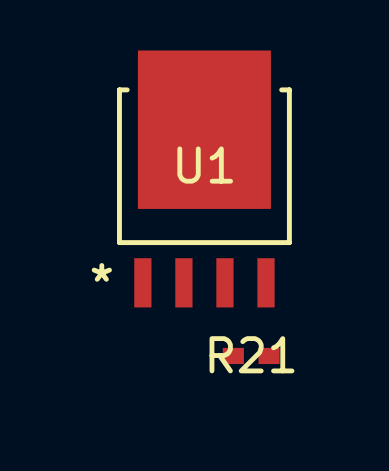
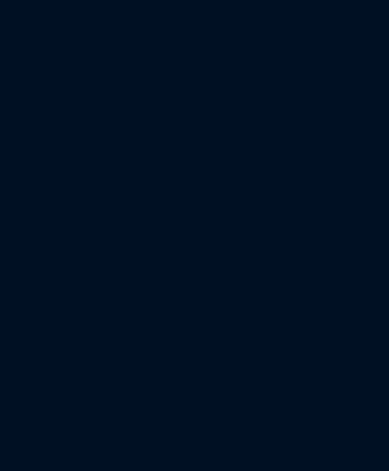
U1: (204, 178) -> none
R21: (251, 355) -> none

